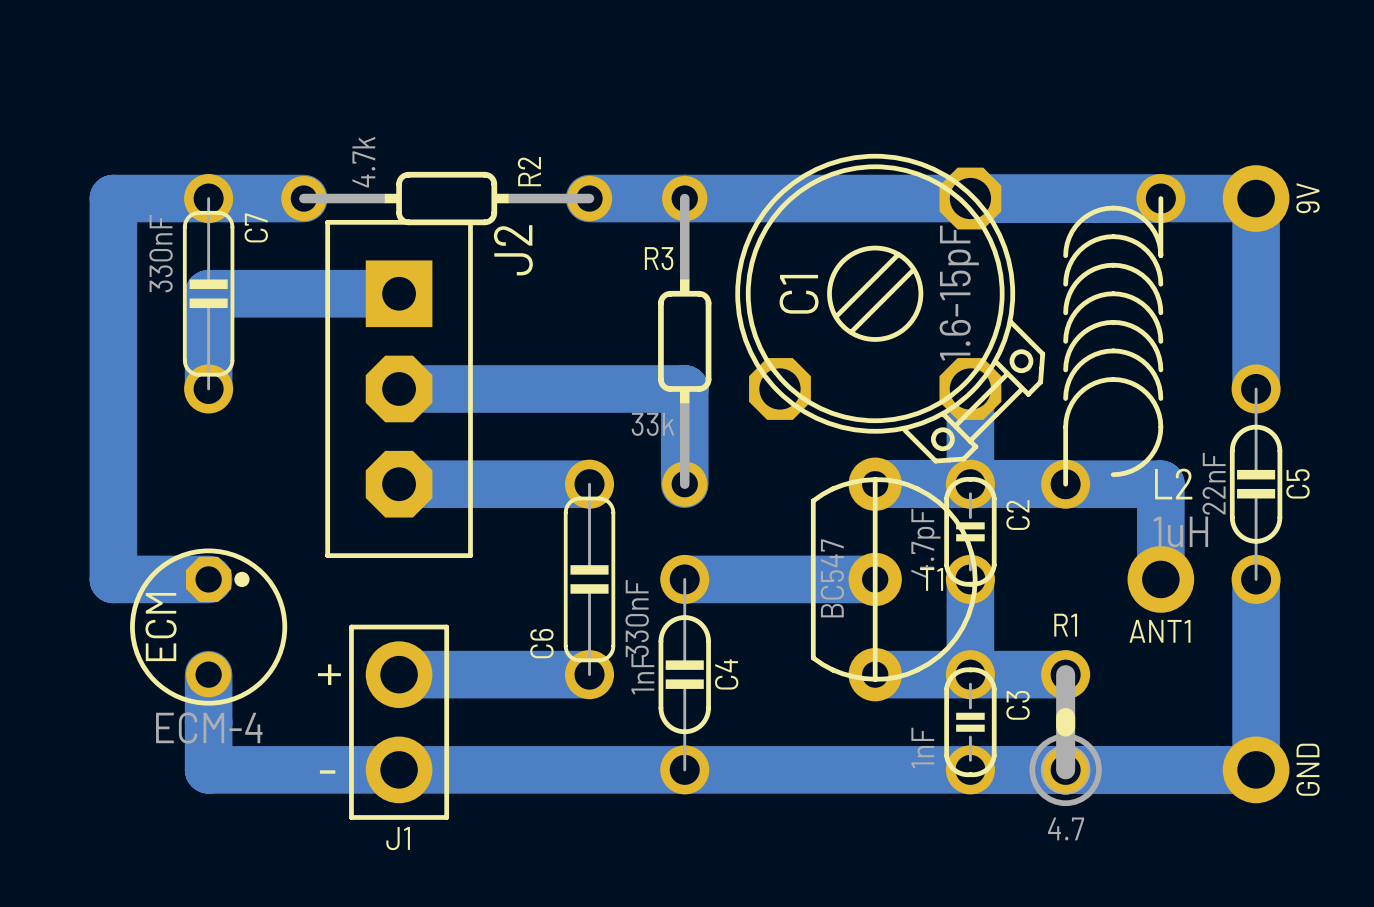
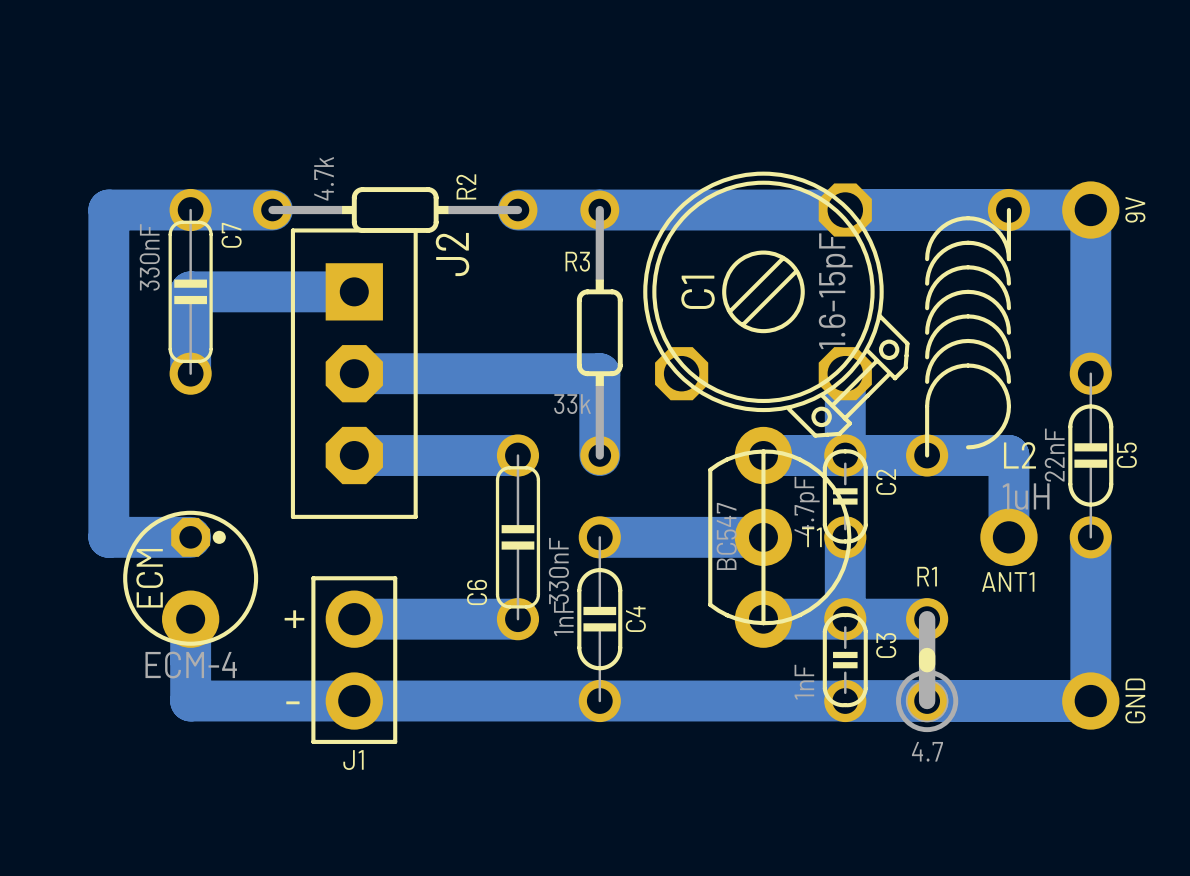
T1 footprint: [810, 457, 978, 702] -> [708, 426, 852, 648]
ECM footprint: [130, 548, 288, 706] -> [123, 510, 259, 648]

